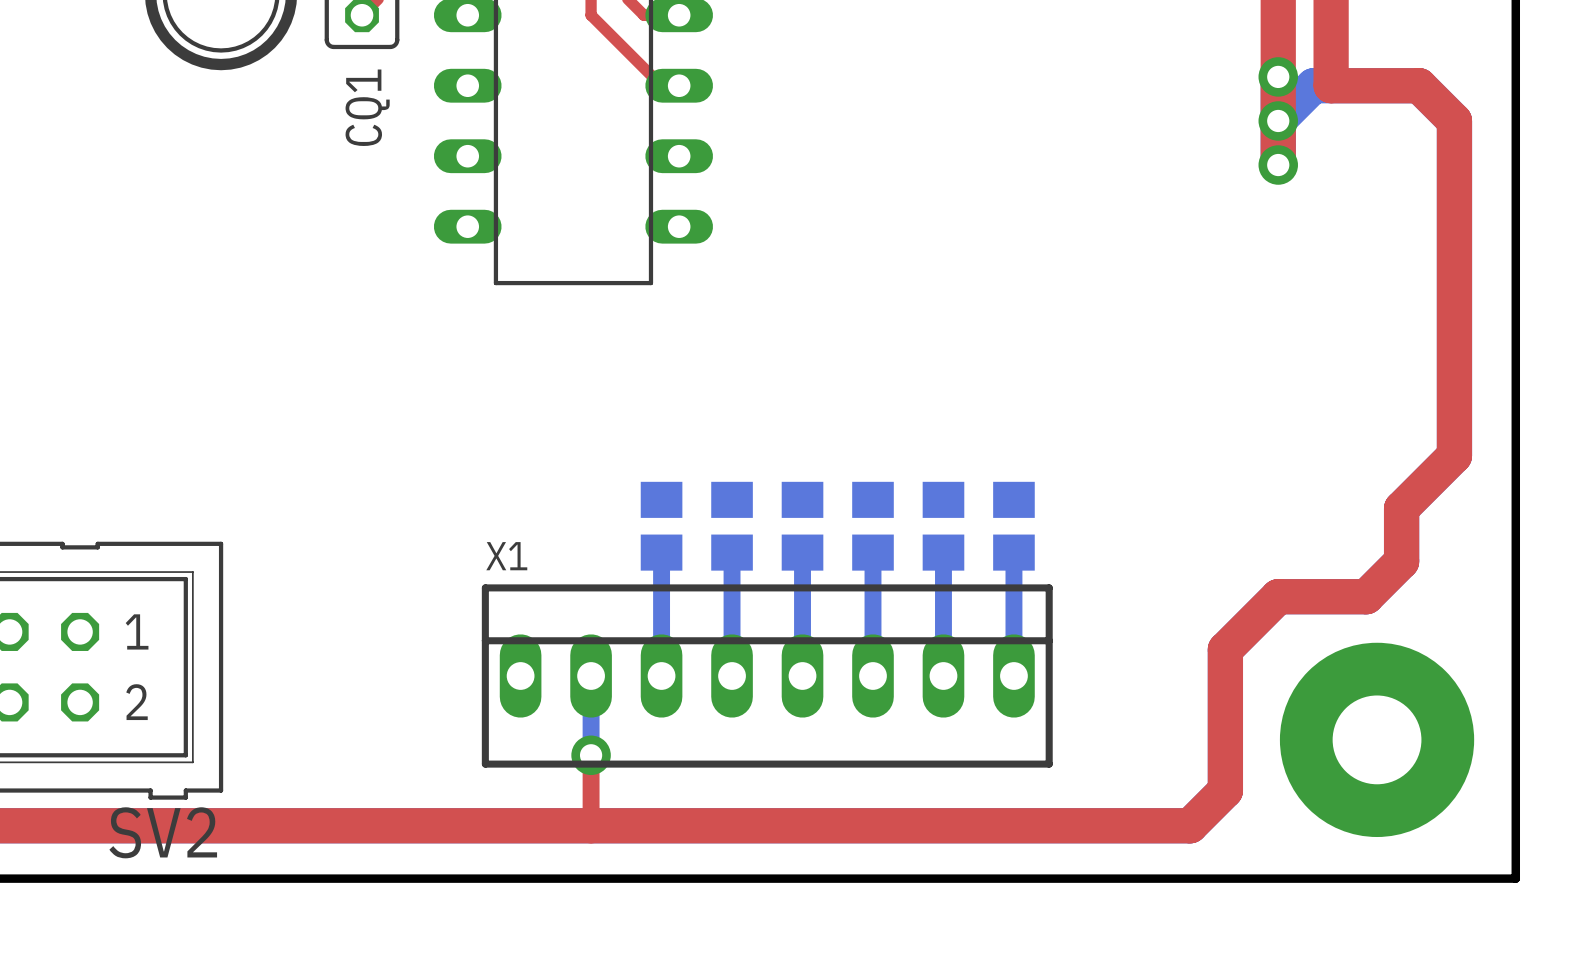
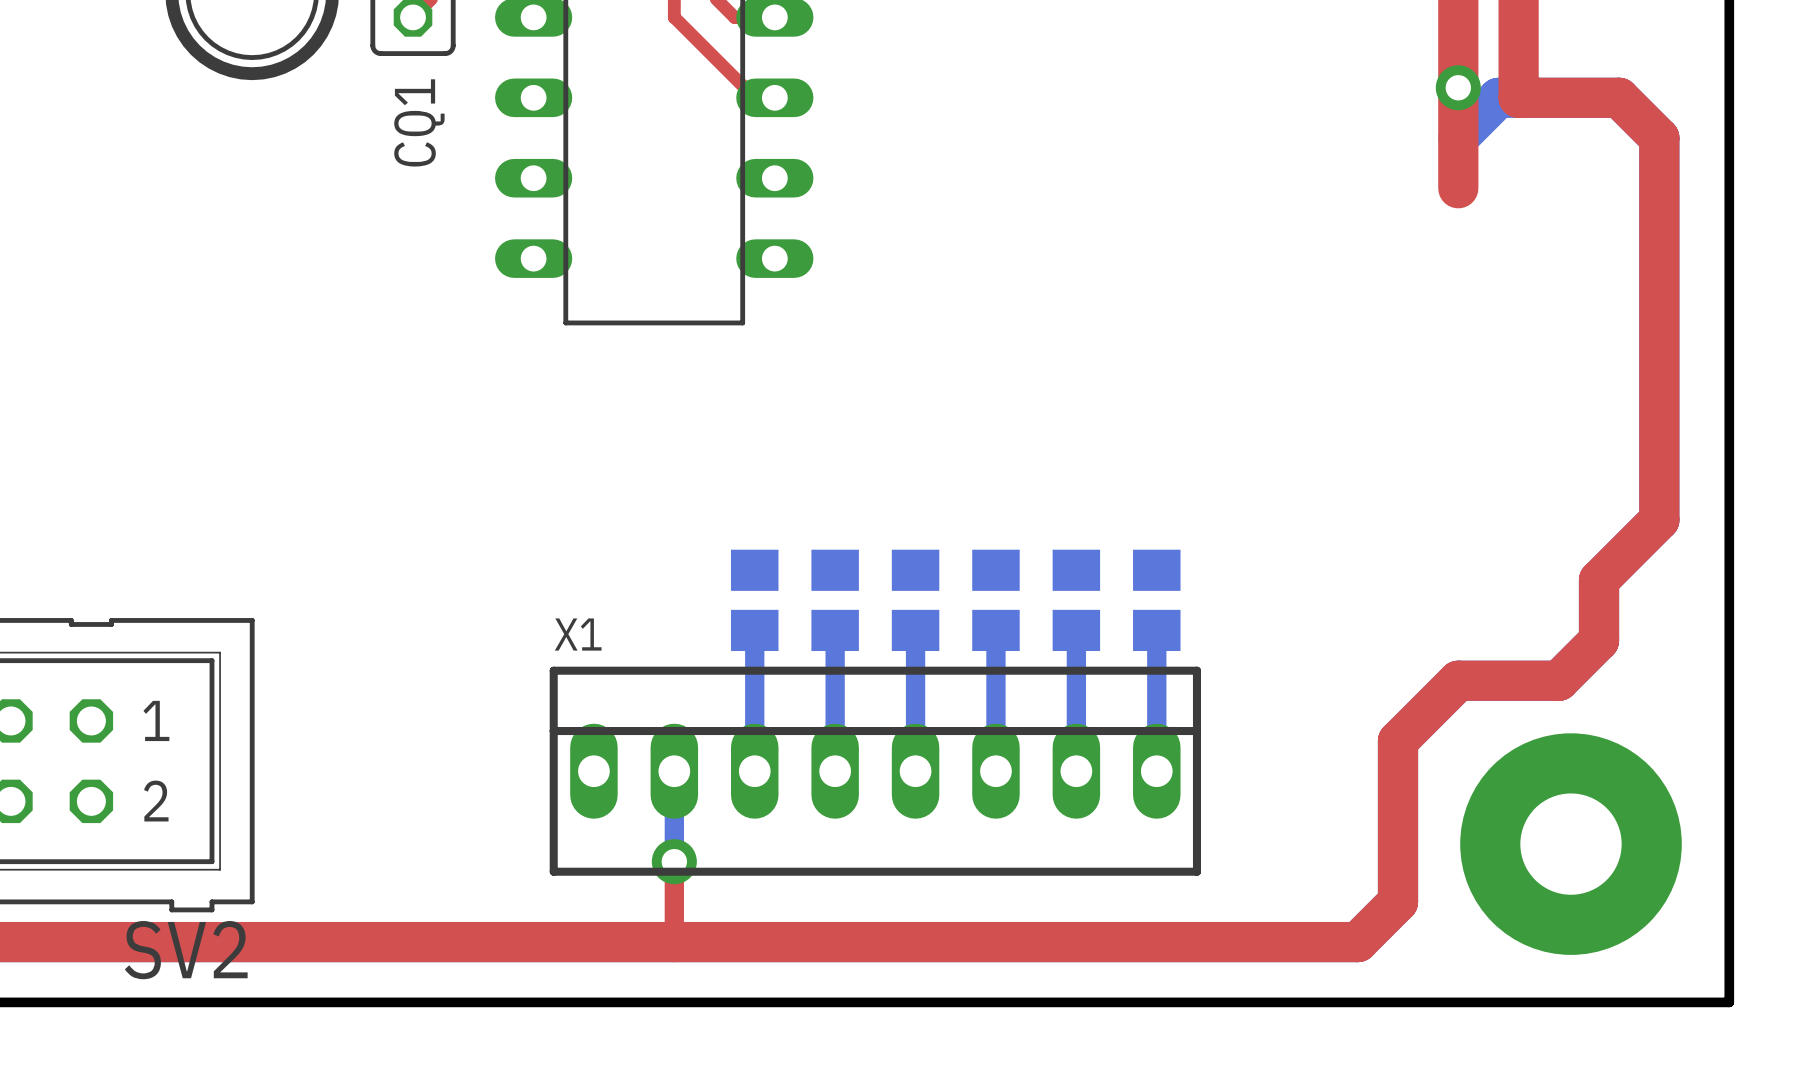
via: (1278, 120) -> none
via: (1278, 165) -> none

